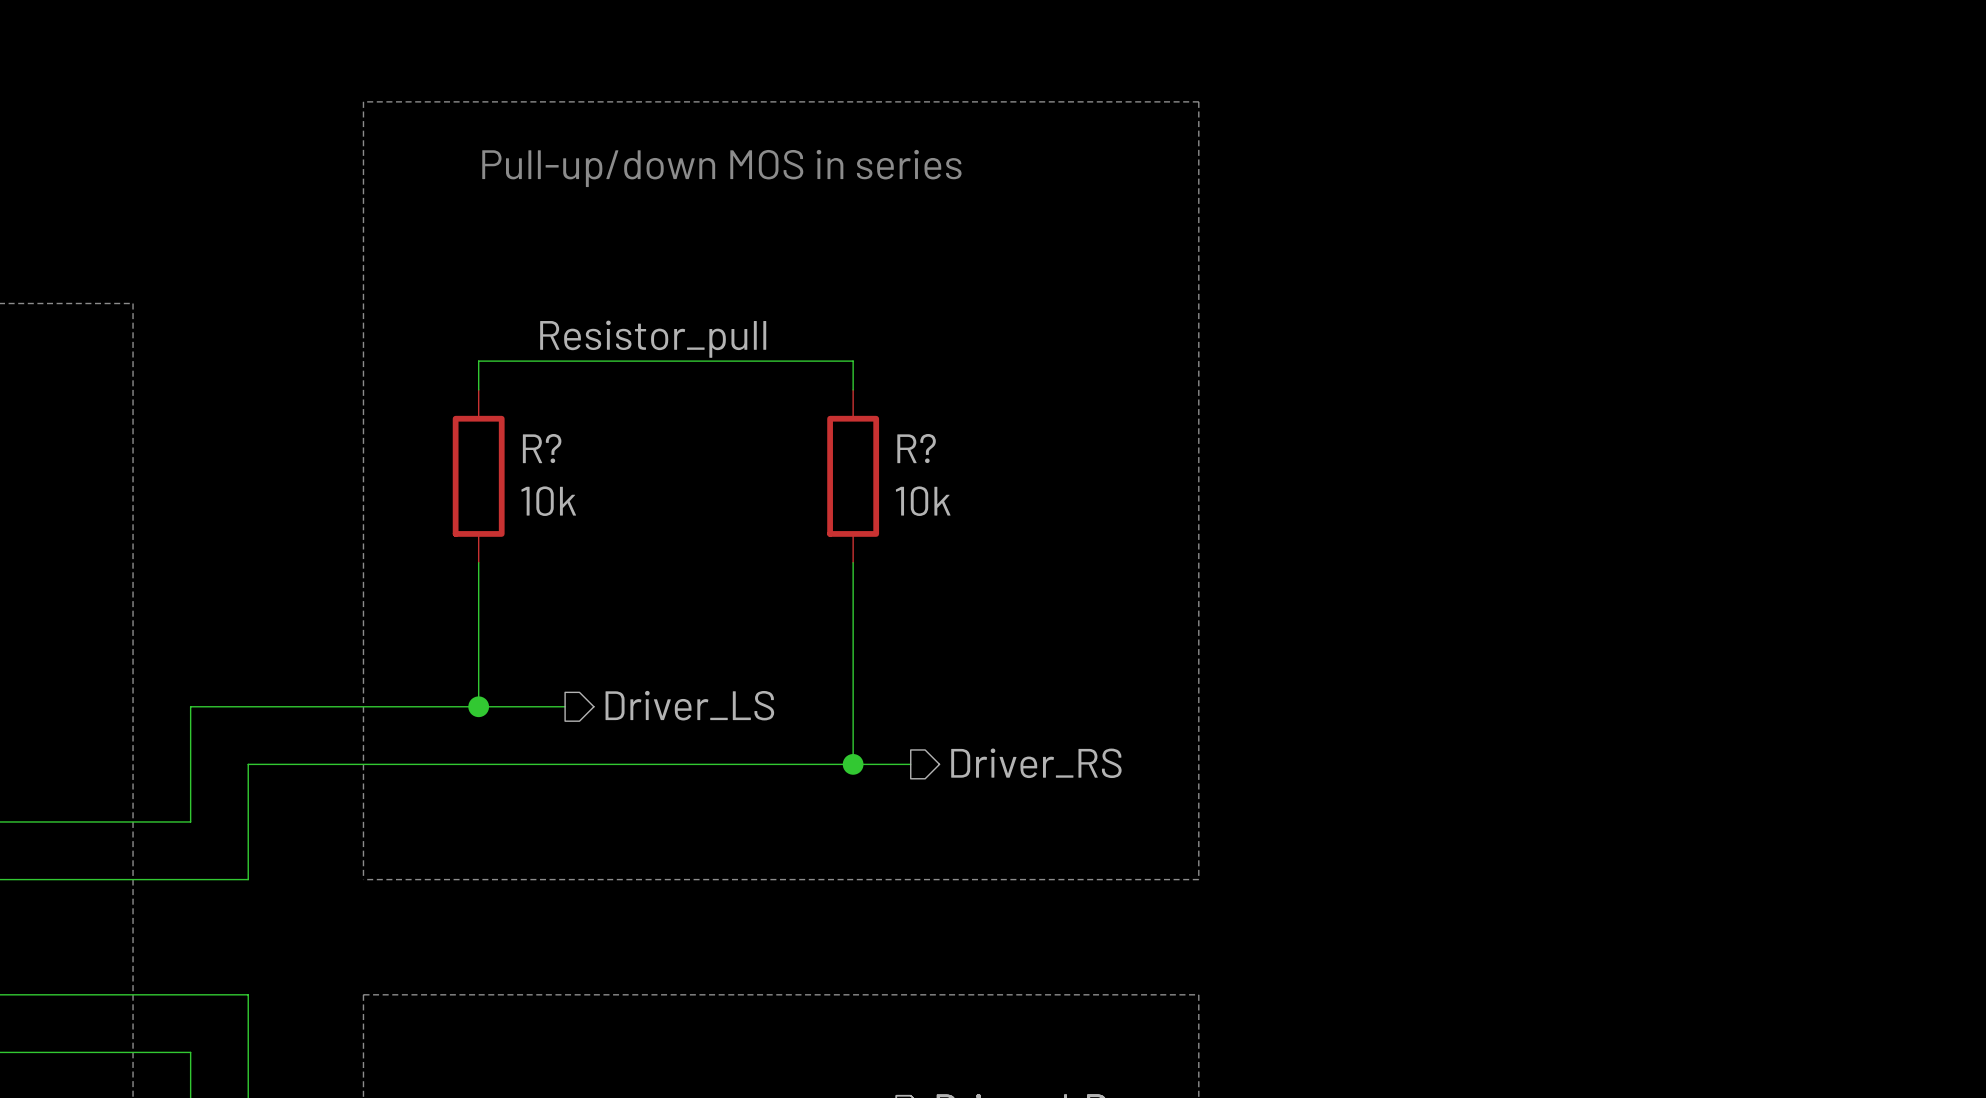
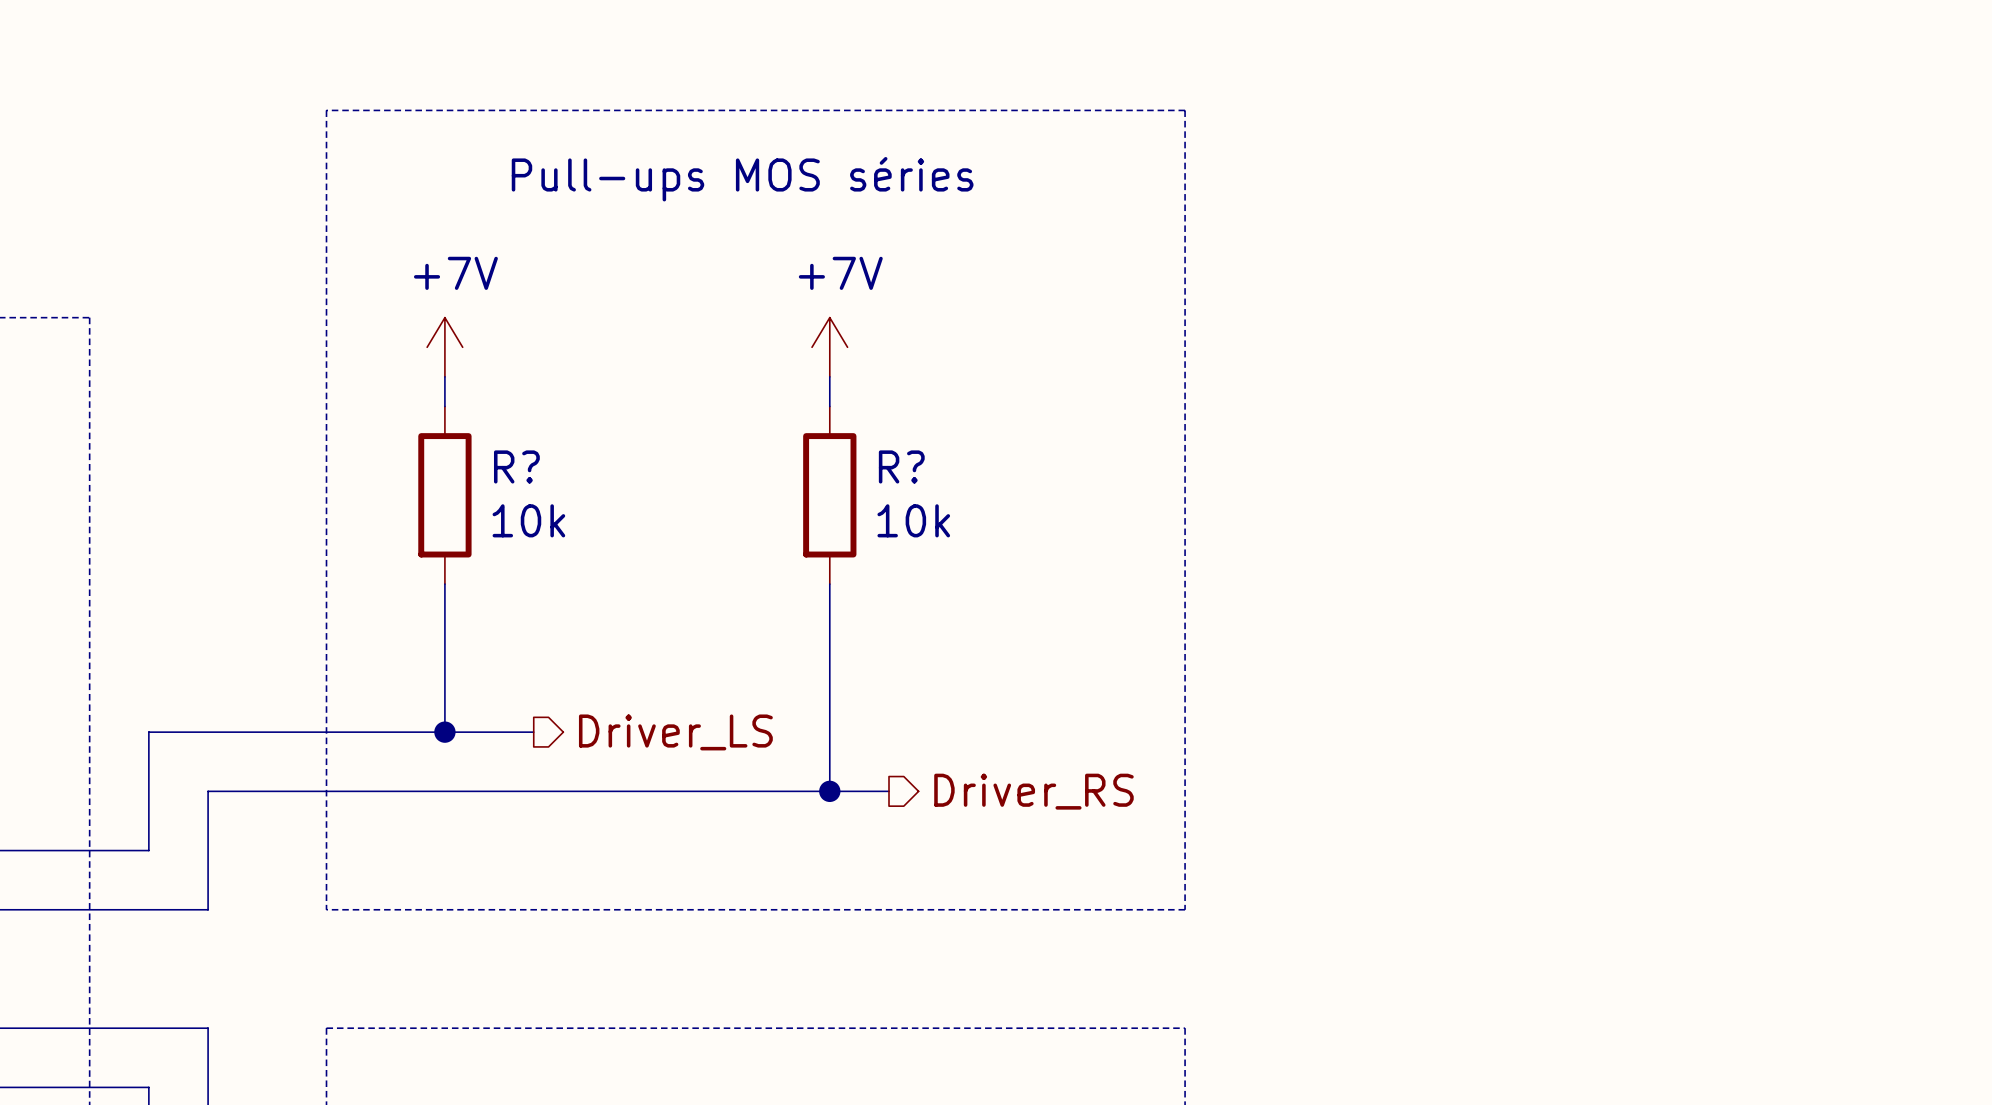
text: Pull-up/down MOS in series (721, 168) -> Pull-ups MOS séries (742, 179)
power symbol: none -> +7V (444, 347)
power symbol: none -> +7V (829, 347)
label: Resistor_pull (653, 339) -> none
wire: (478, 361) (853, 361) -> none

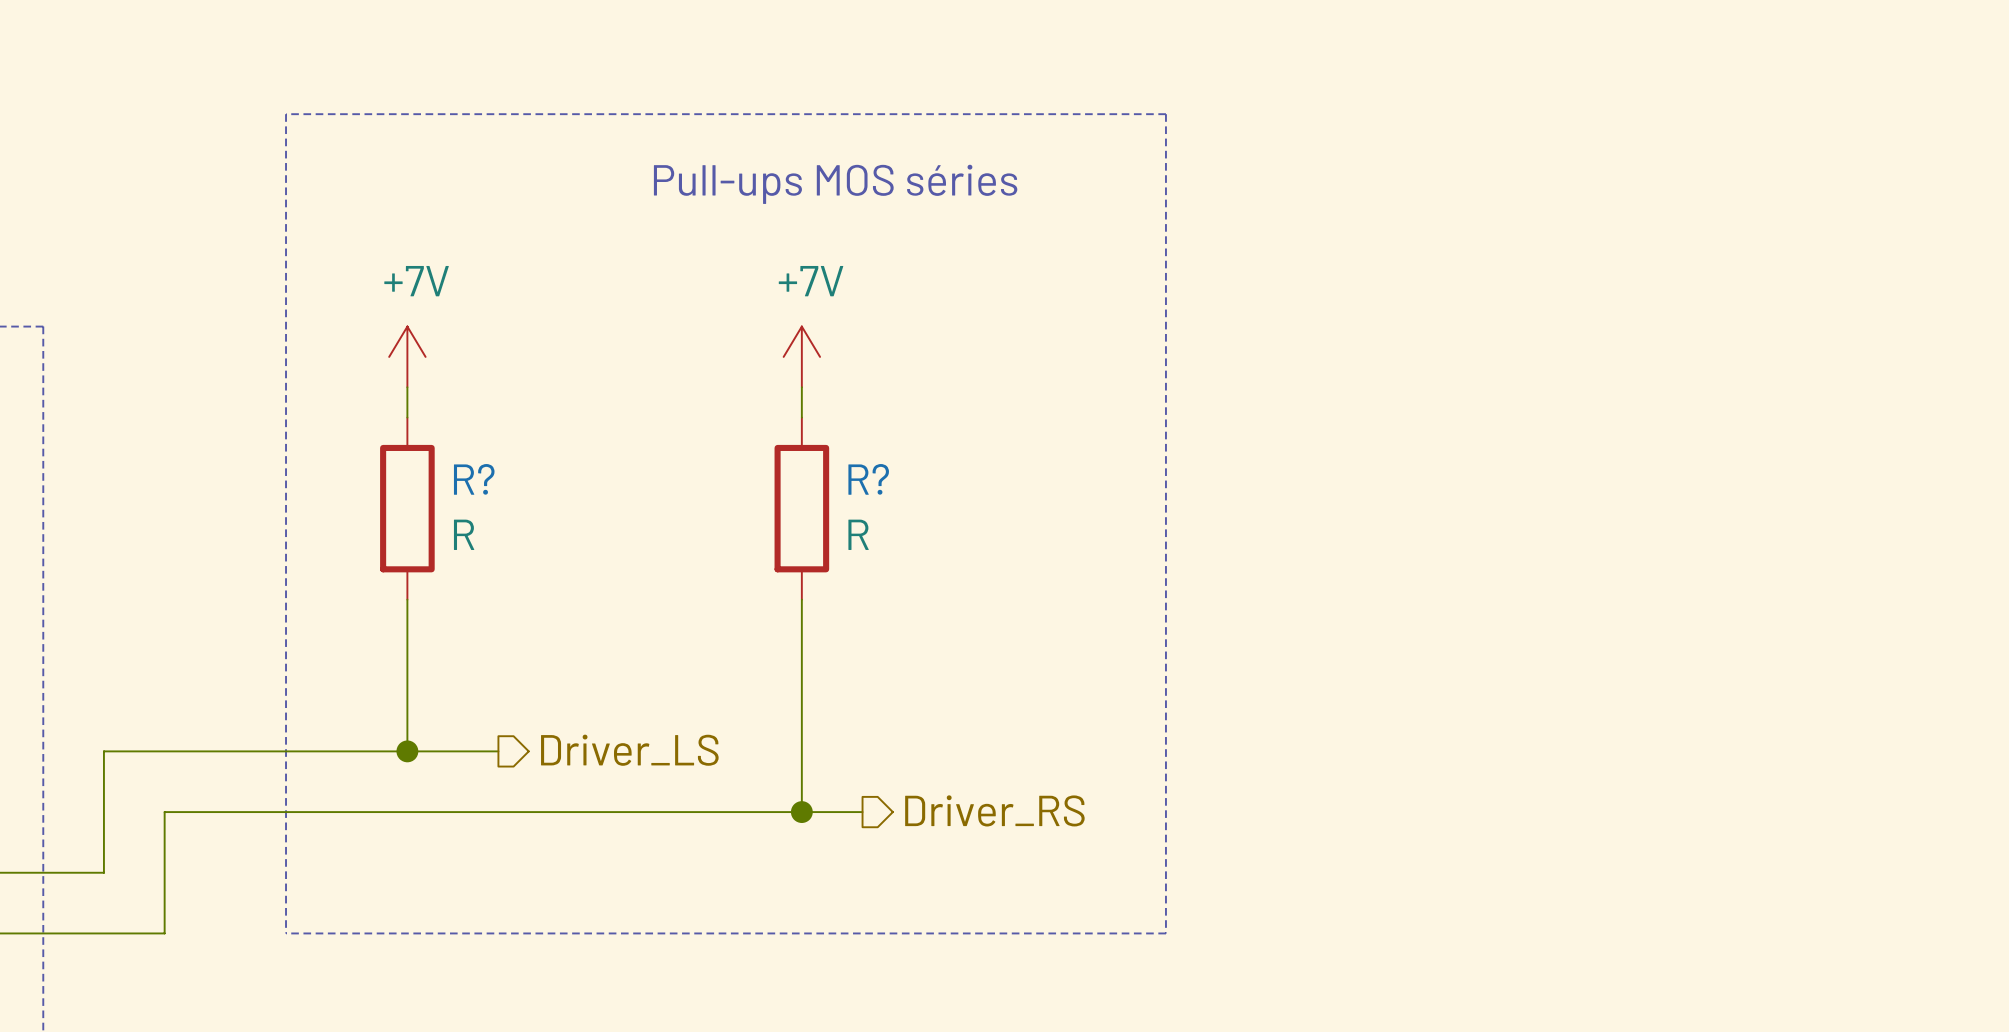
text position: Pull-ups MOS séries (742, 179) -> Pull-ups MOS séries (835, 184)
R? value: 10k (528, 520) -> R (464, 534)
R? value: 10k (913, 520) -> R (858, 534)

